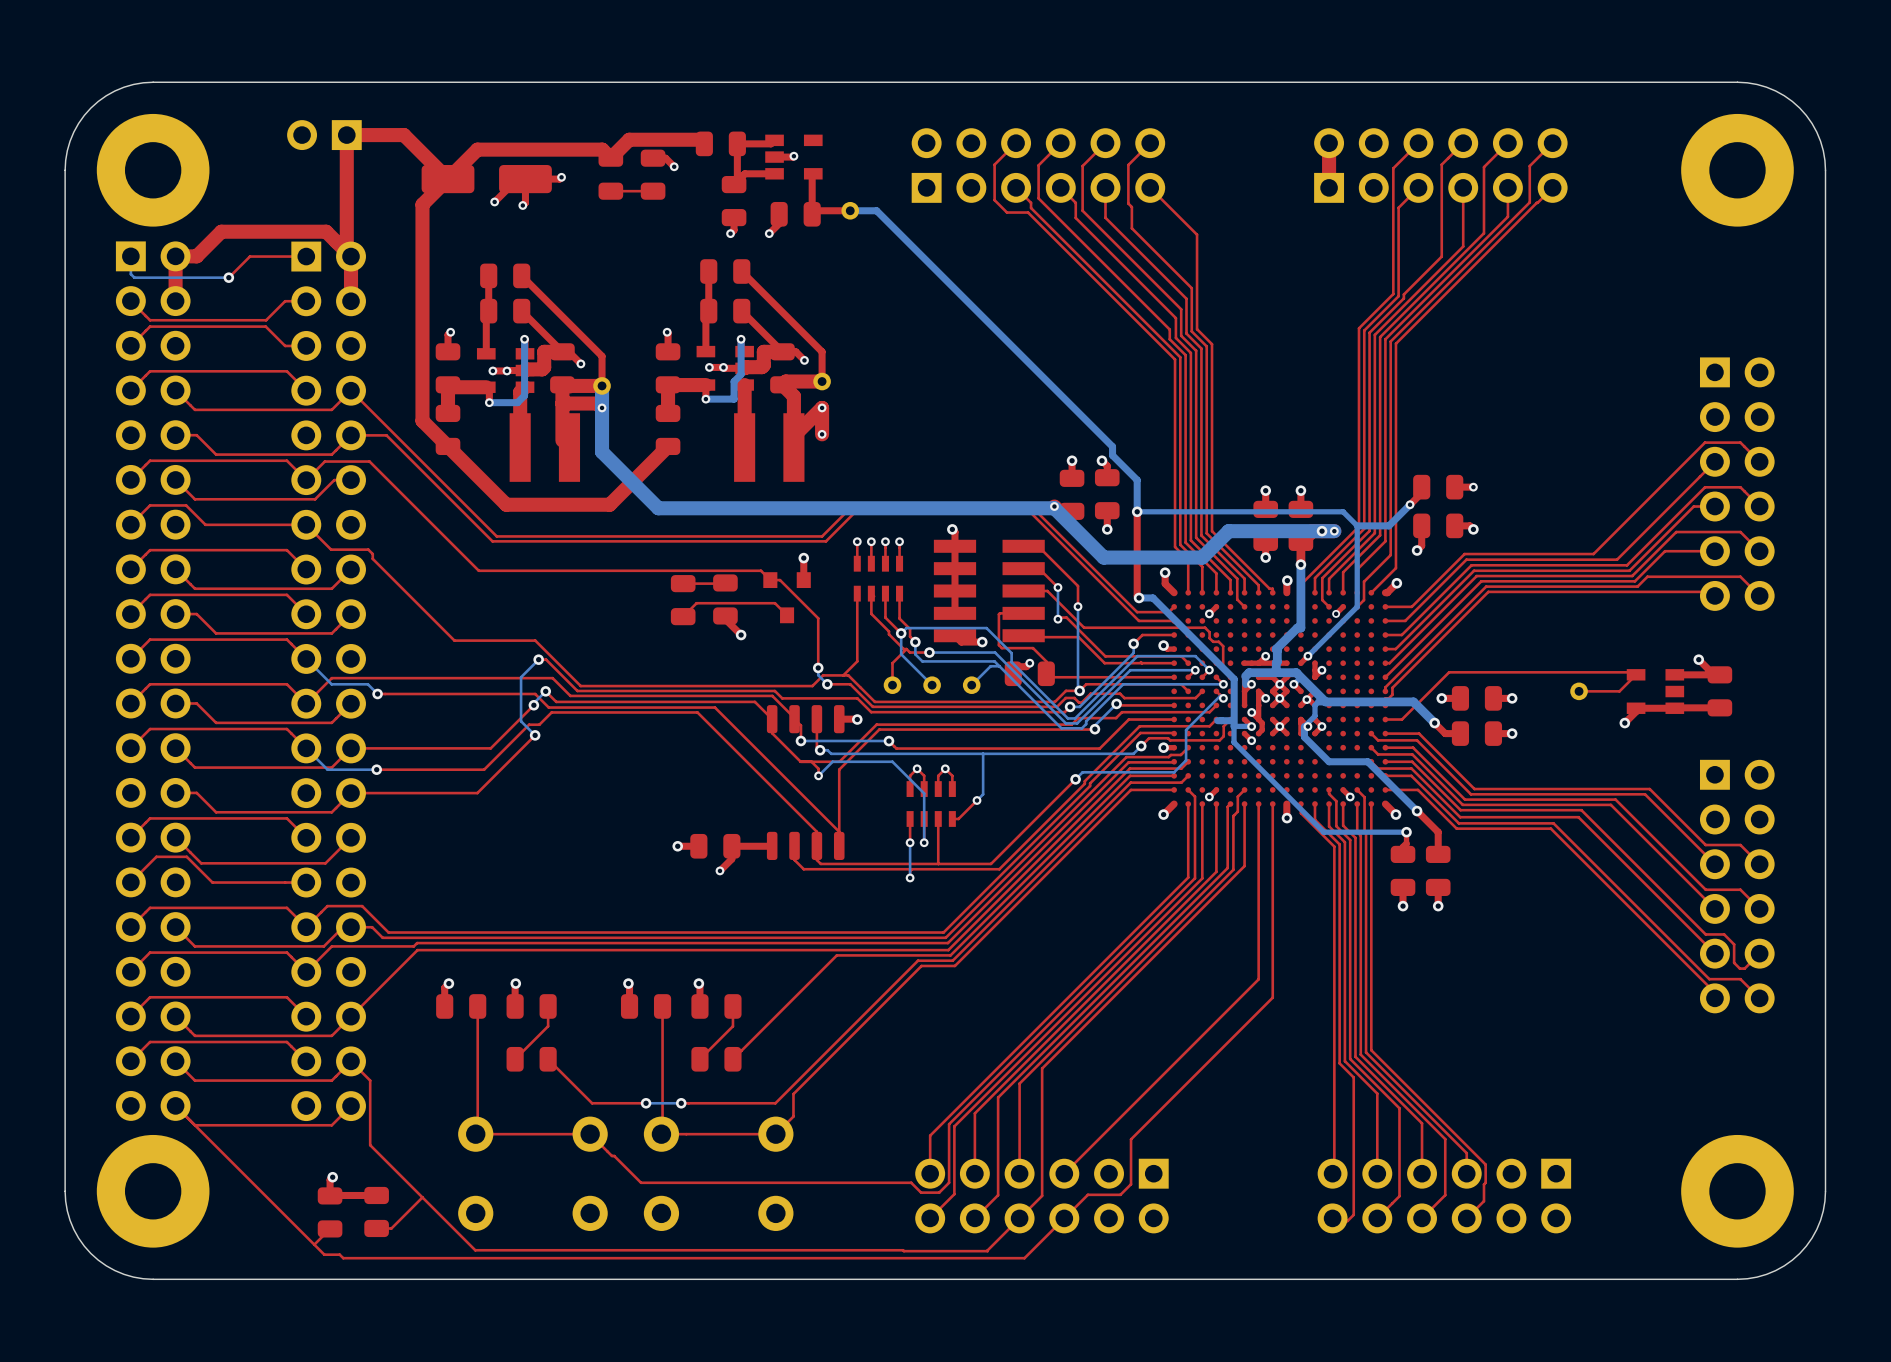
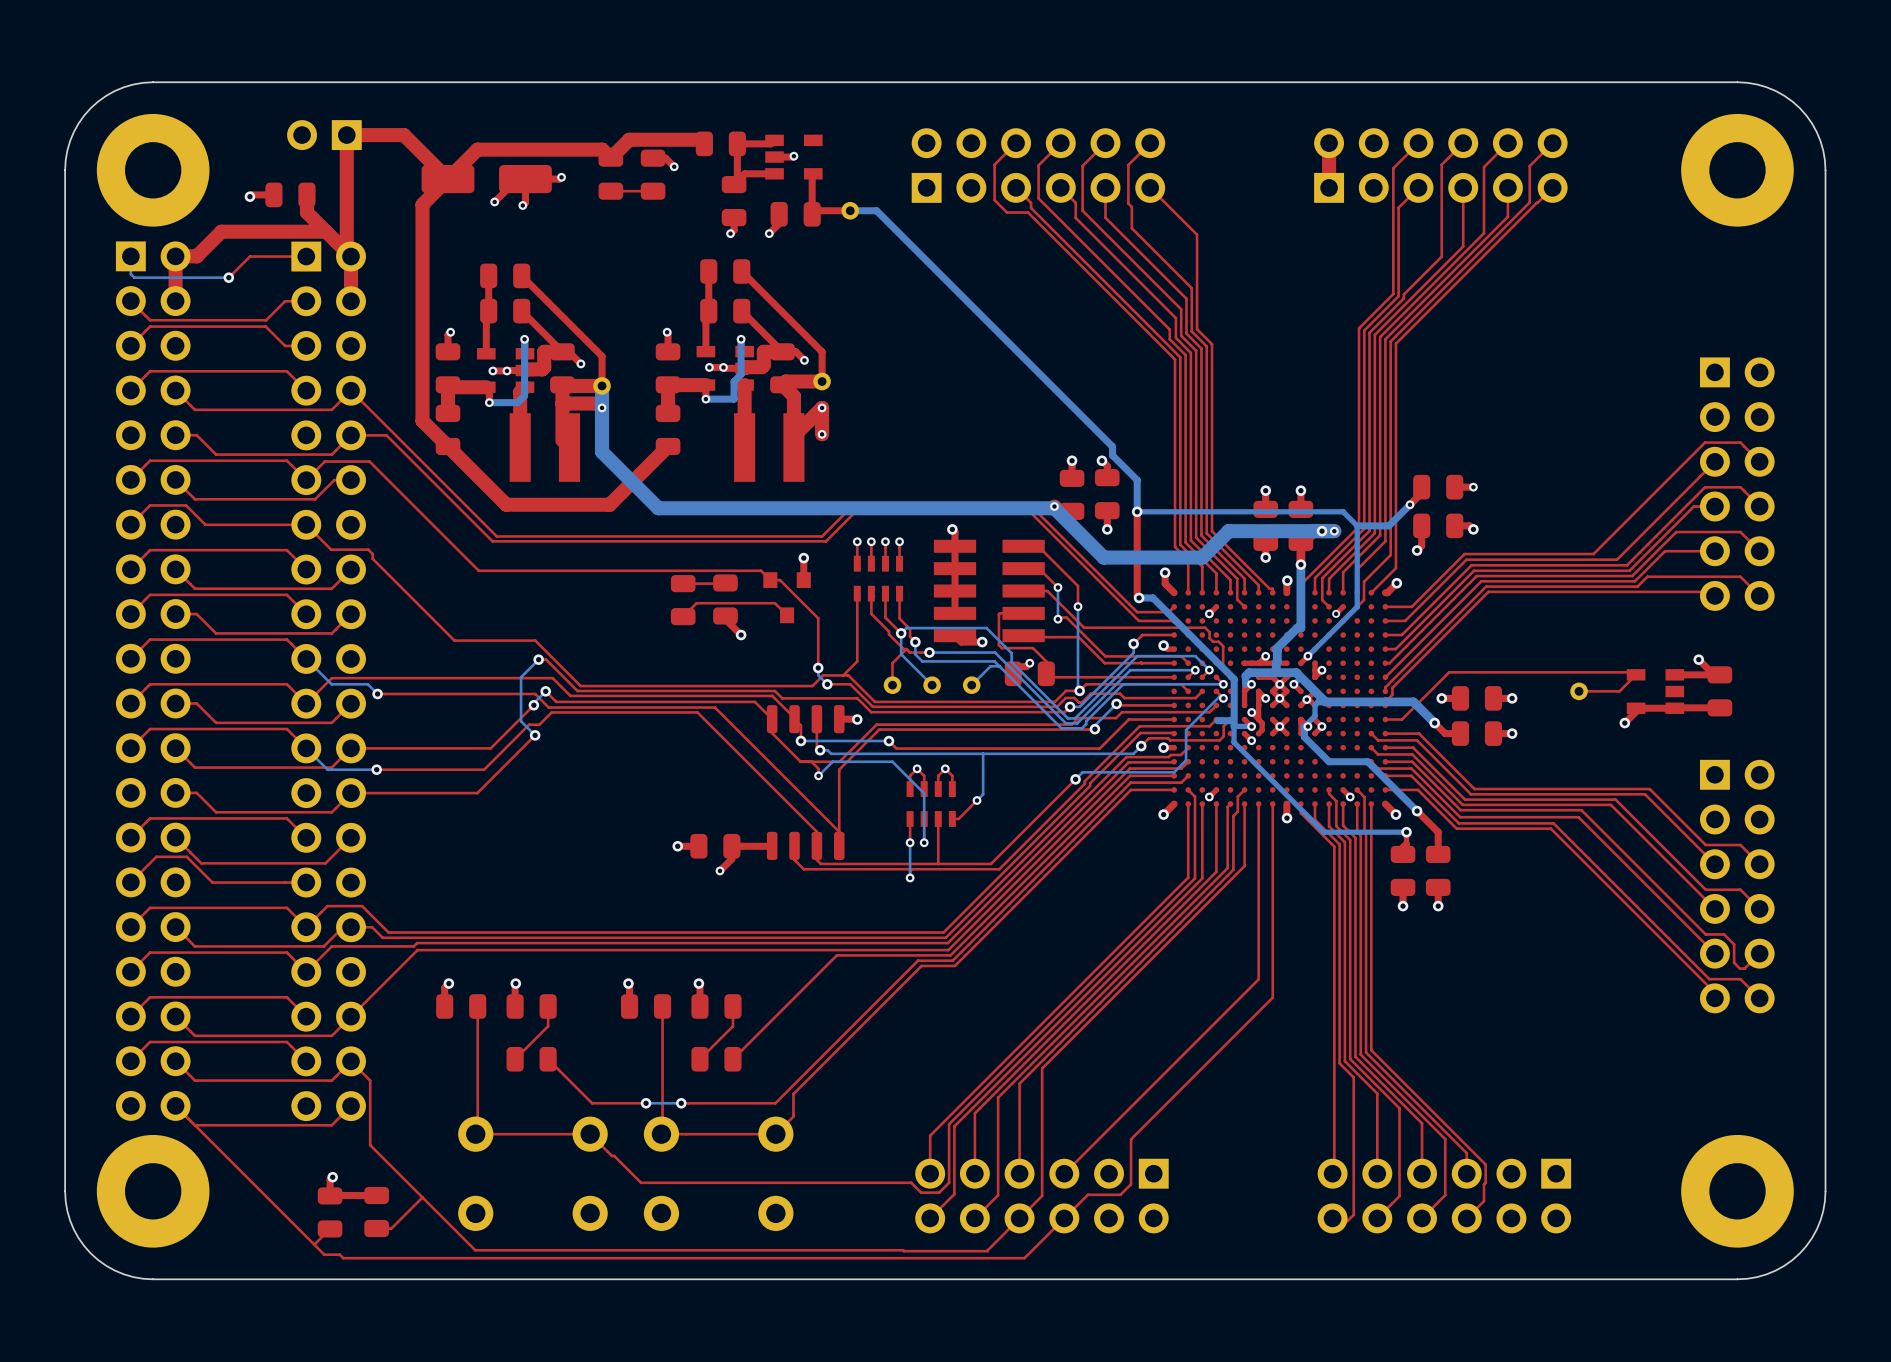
top track: none -> (273, 194) (251, 194) (249, 196)
part: none -> (290, 194)
top track: none -> (306, 194) (306, 212) (326, 231)
via: none -> (249, 196)

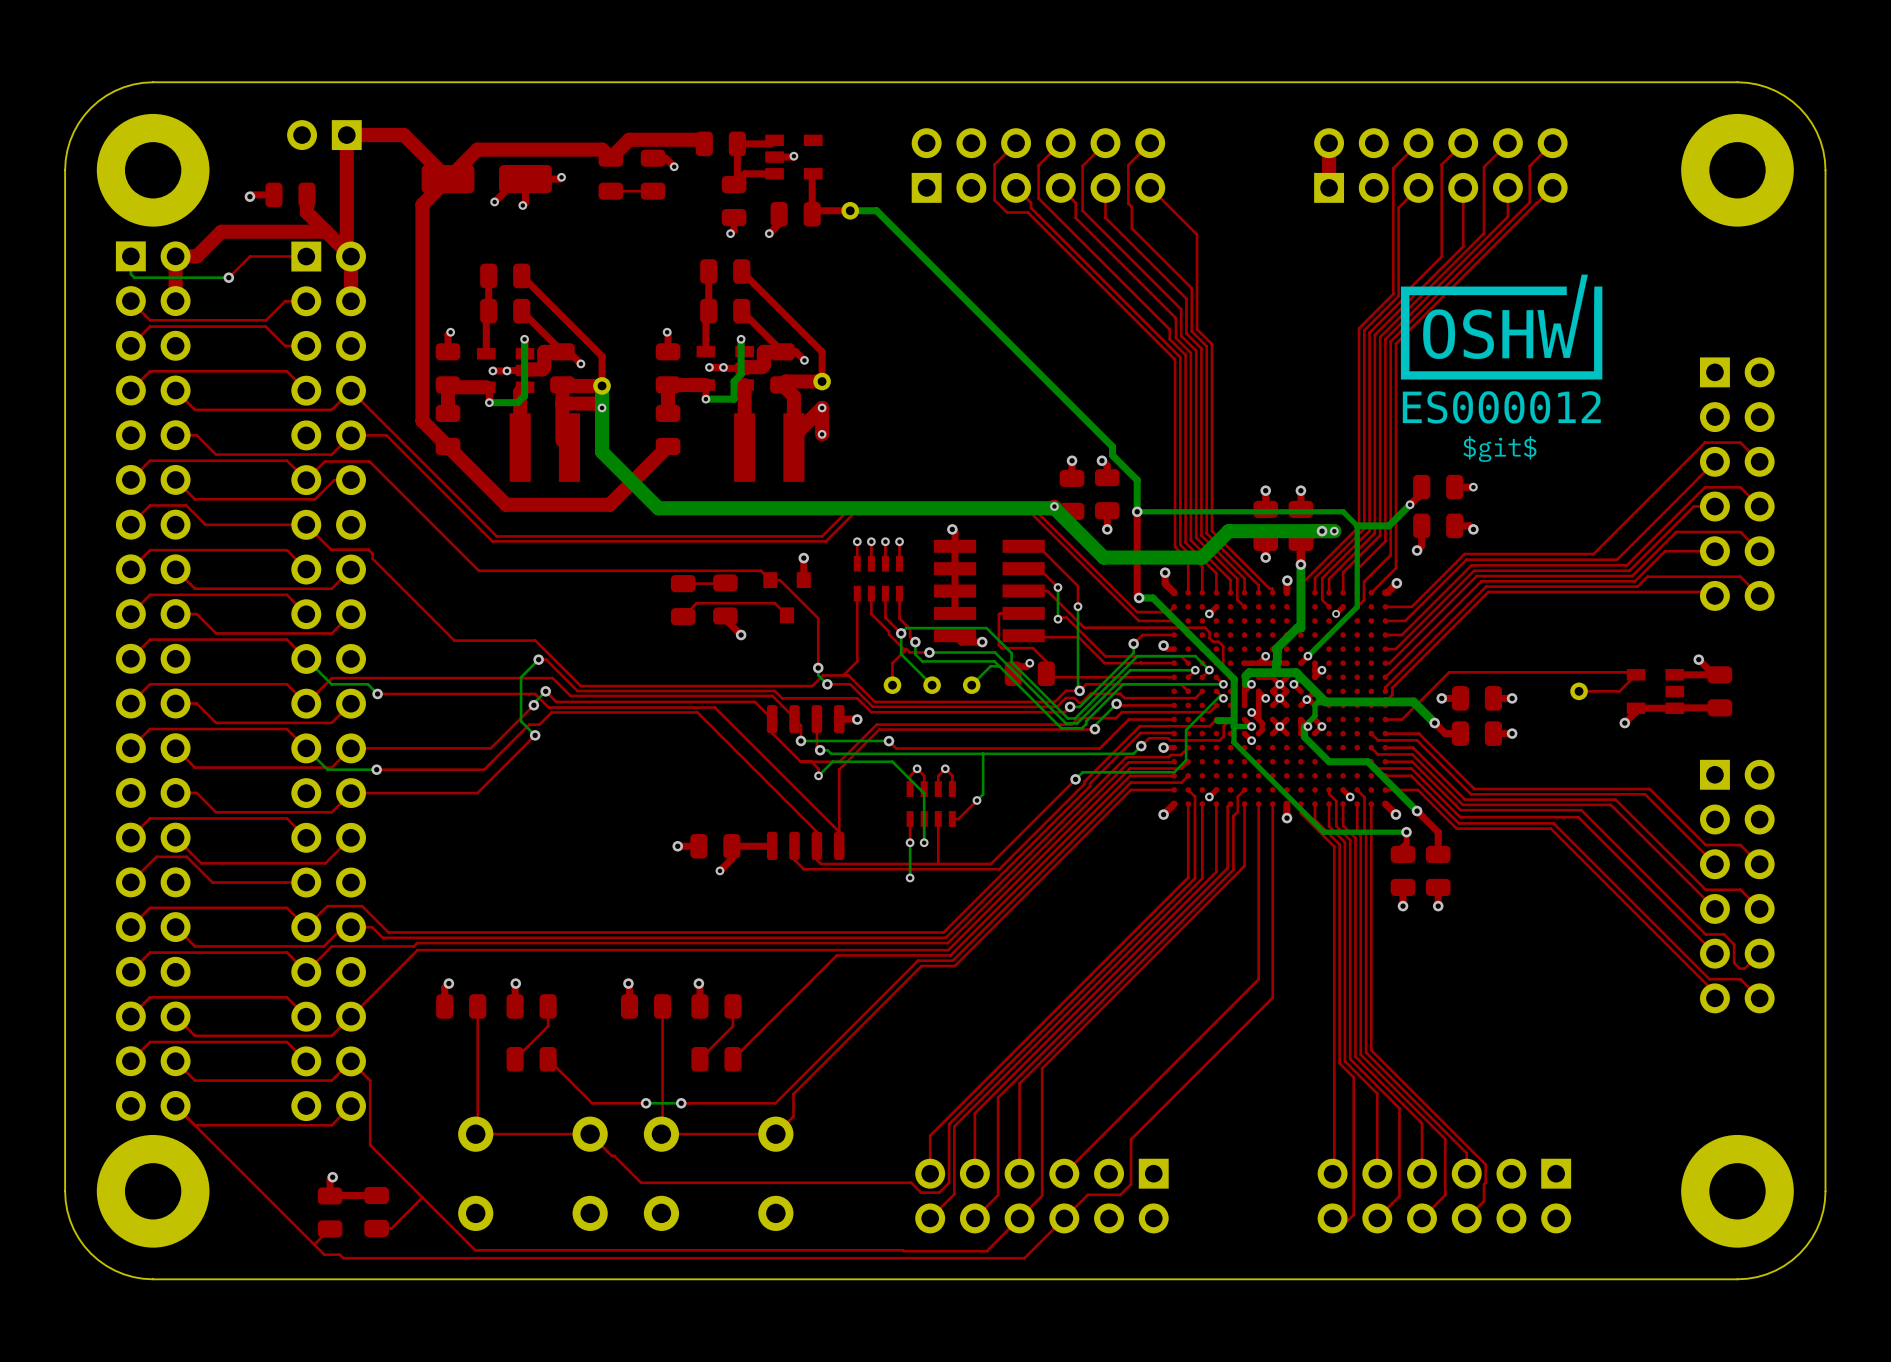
drawing: none -> [1400, 274, 1603, 424]
text: none -> $git$ (1499, 449)

